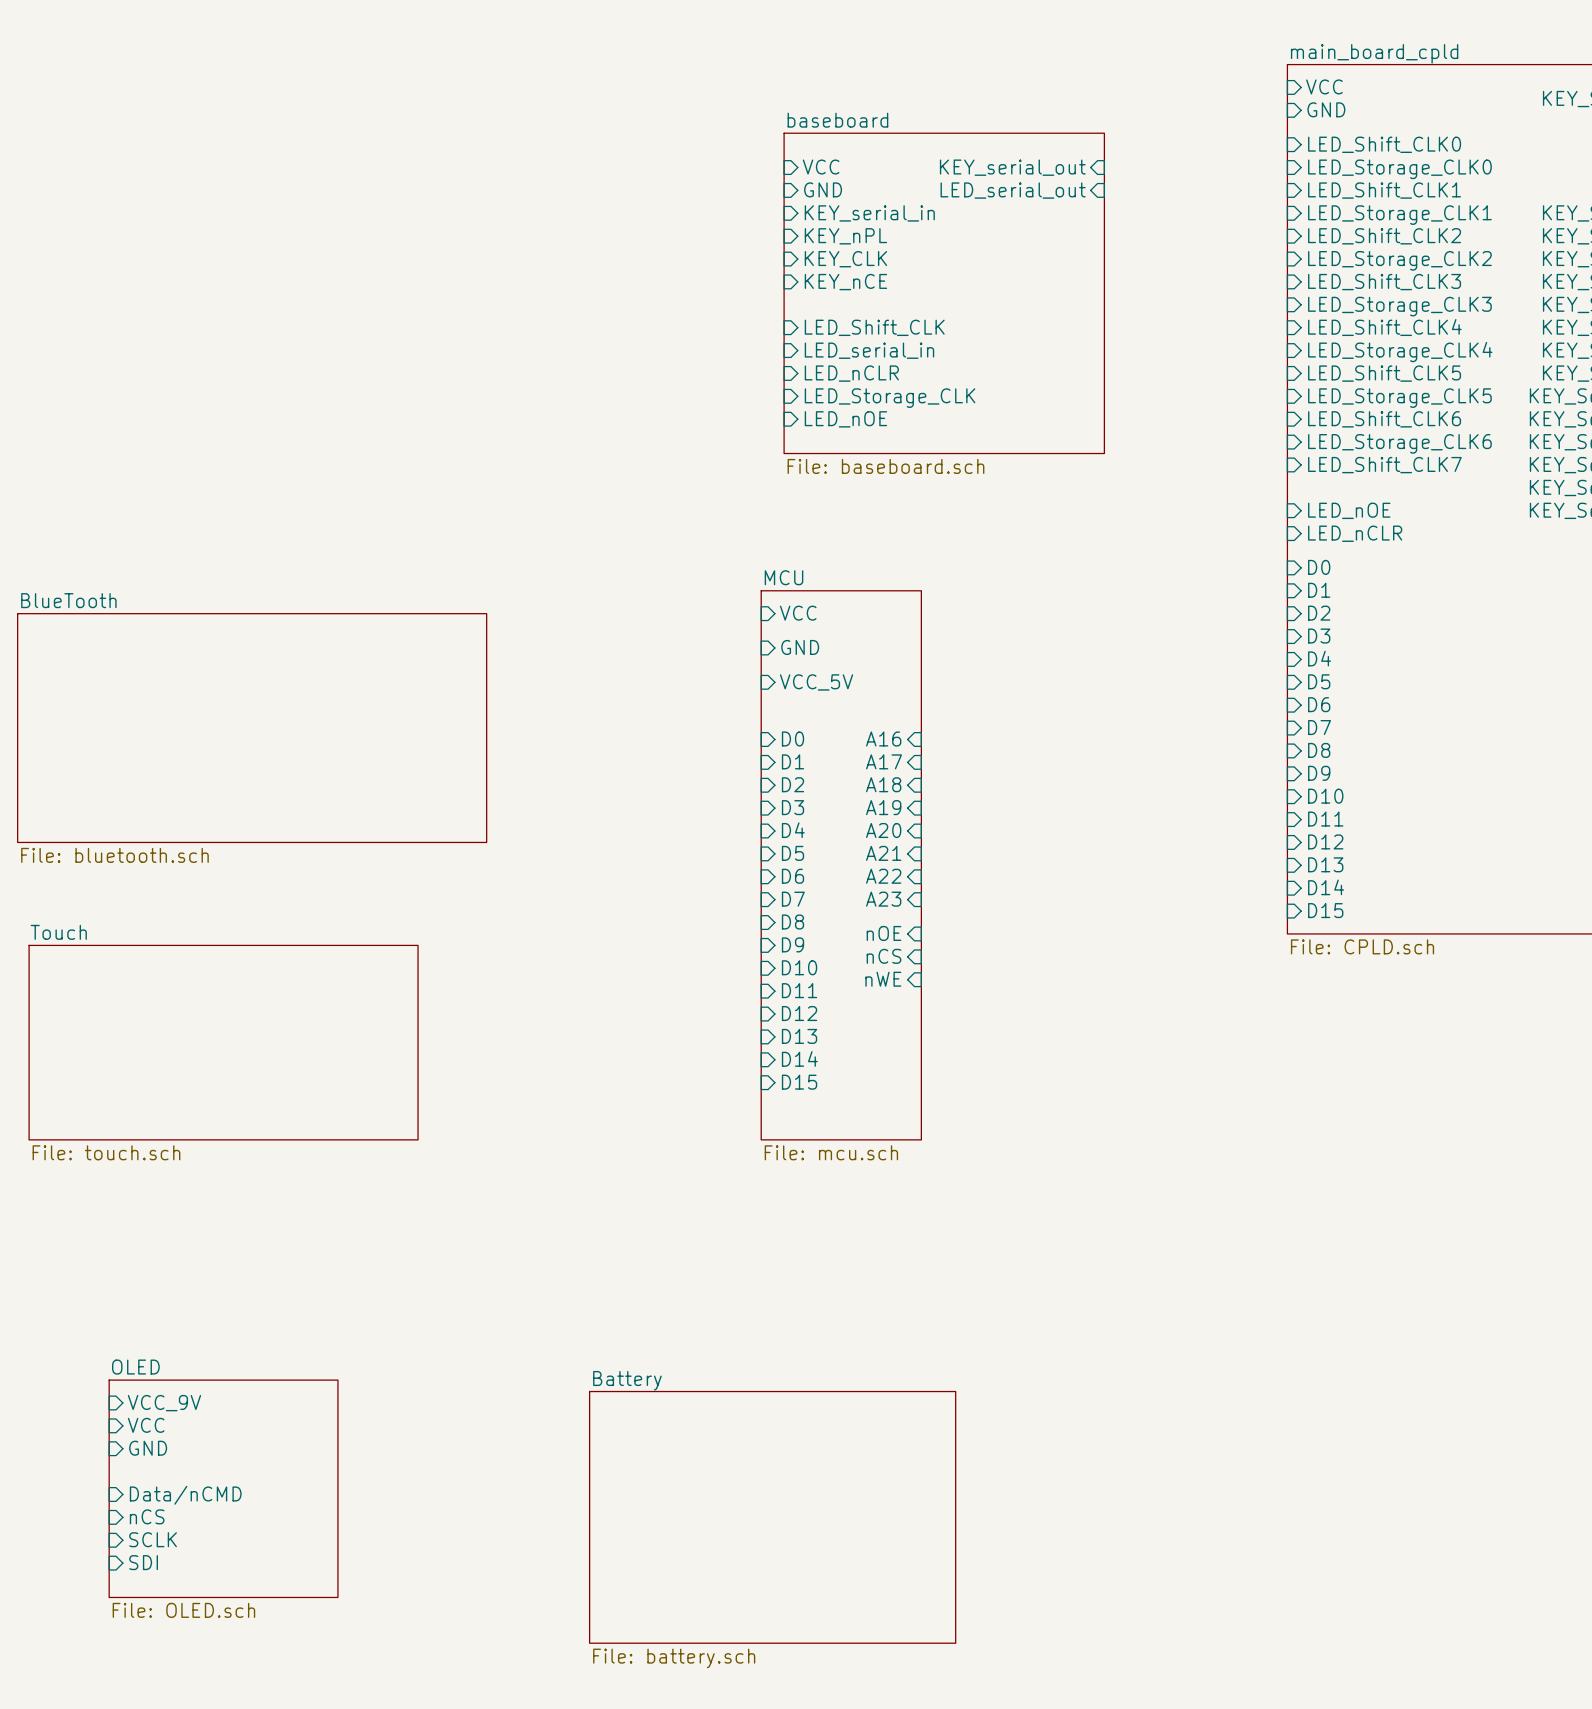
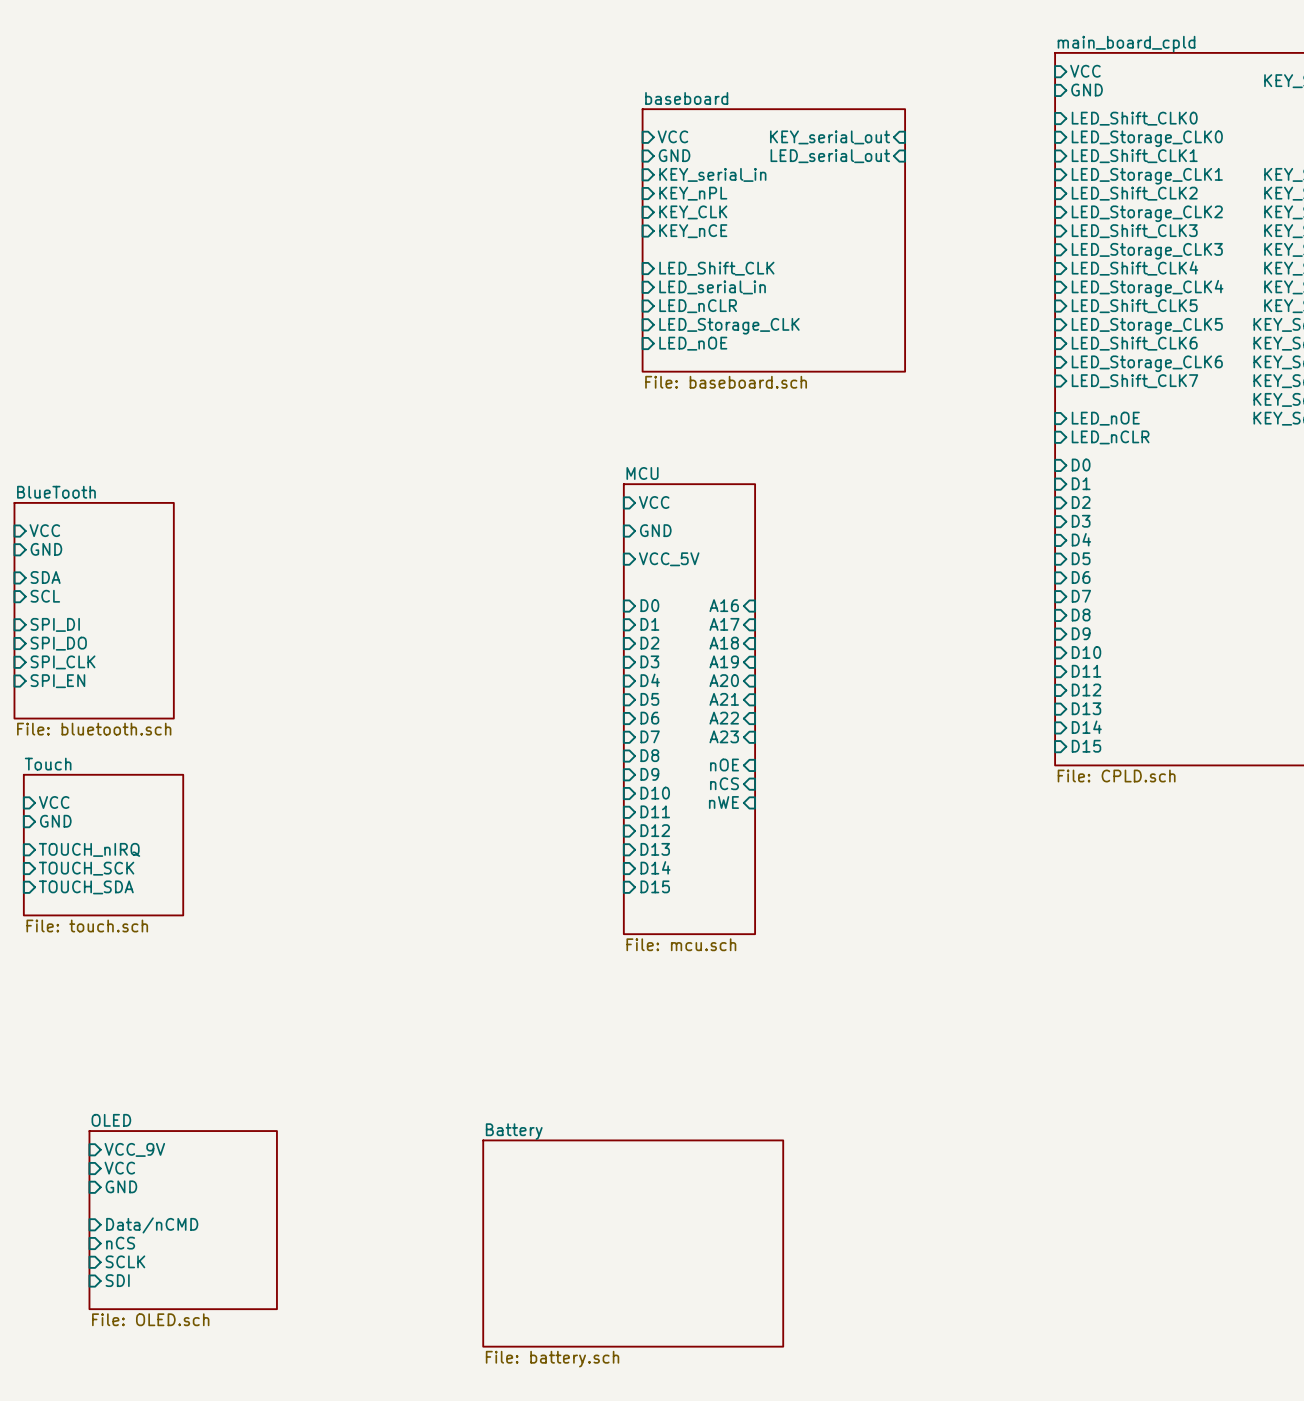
sheet pin: none -> VCC (44, 530)
sheet pin: none -> GND (46, 549)
sheet pin: none -> SDA (45, 577)
sheet pin: none -> SCL (45, 596)
sheet BlueTooth: File: bluetooth.sch (252, 728) -> none
sheet BlueTooth: none -> File: bluetooth.sch (94, 610)
sheet pin: none -> SPI_DI (55, 624)
sheet pin: none -> SPI_DO (58, 643)
sheet pin: none -> SPI_CLK (63, 662)
sheet pin: none -> SPI_EN (57, 681)
sheet pin: none -> VCC (54, 802)
sheet pin: none -> GND (55, 821)
sheet Touch: none -> File: touch.sch (103, 845)
sheet pin: none -> TOUCH_nIRQ (89, 849)
sheet Touch: File: touch.sch (223, 1042) -> none
sheet pin: none -> TOUCH_SCK (86, 868)
sheet pin: none -> TOUCH_SDA (86, 887)

